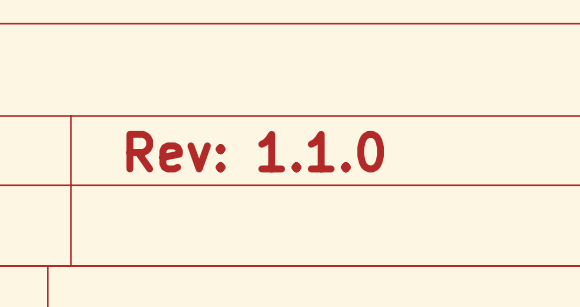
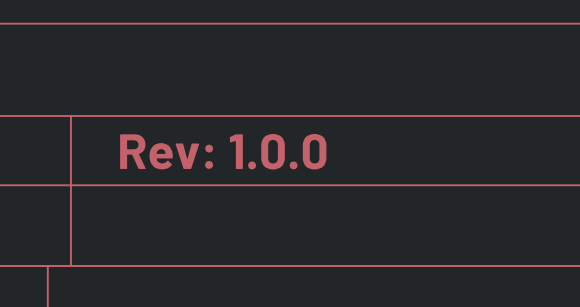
title block: Rev: 1.1.0 (255, 151) -> Rev: 1.0.0 (223, 151)

